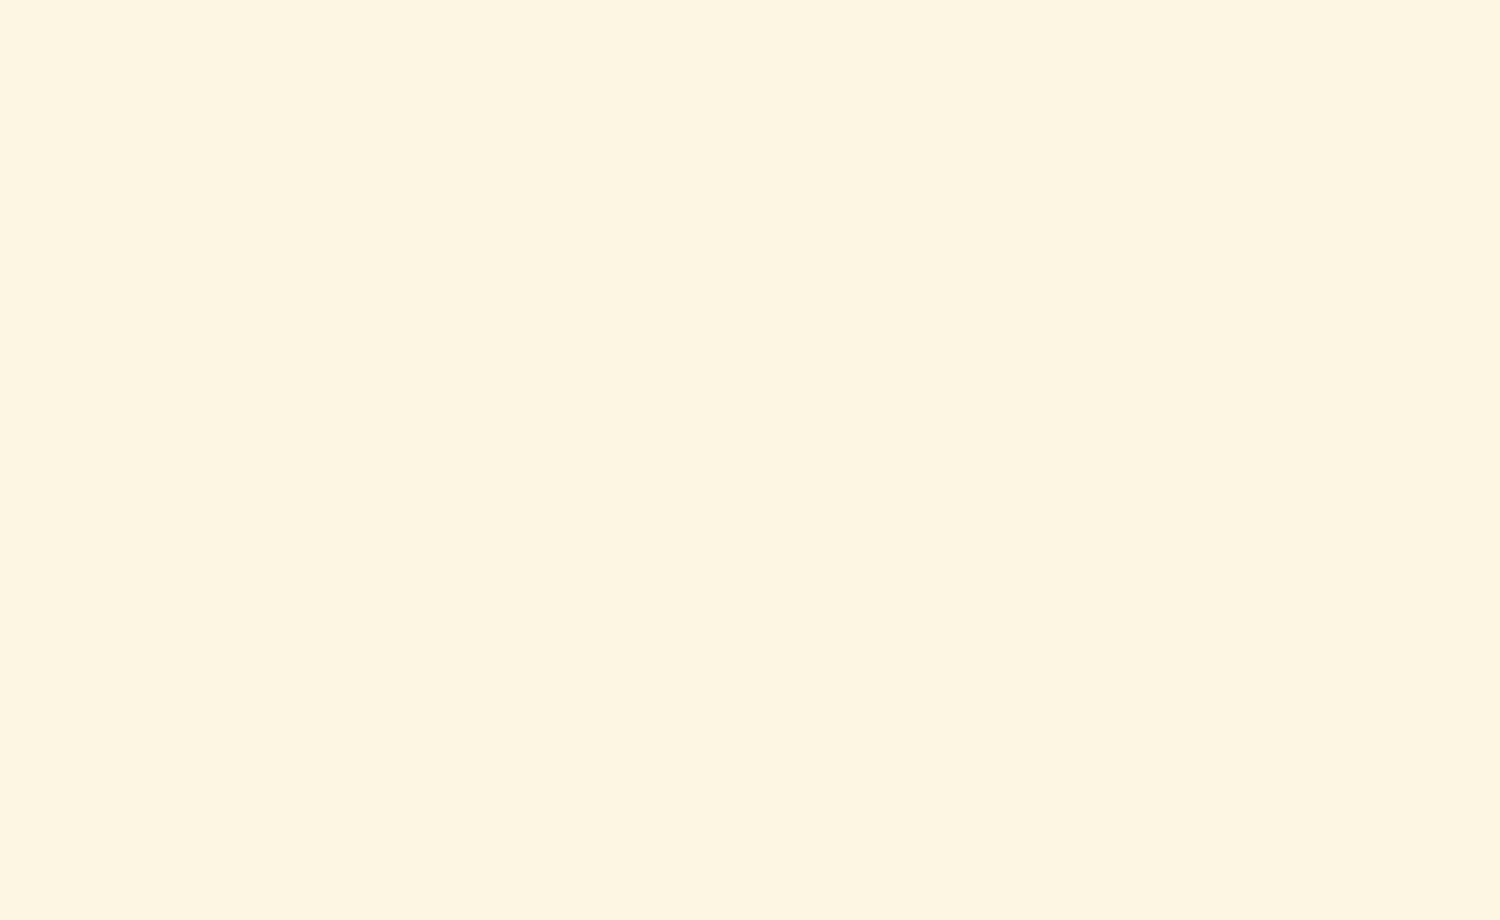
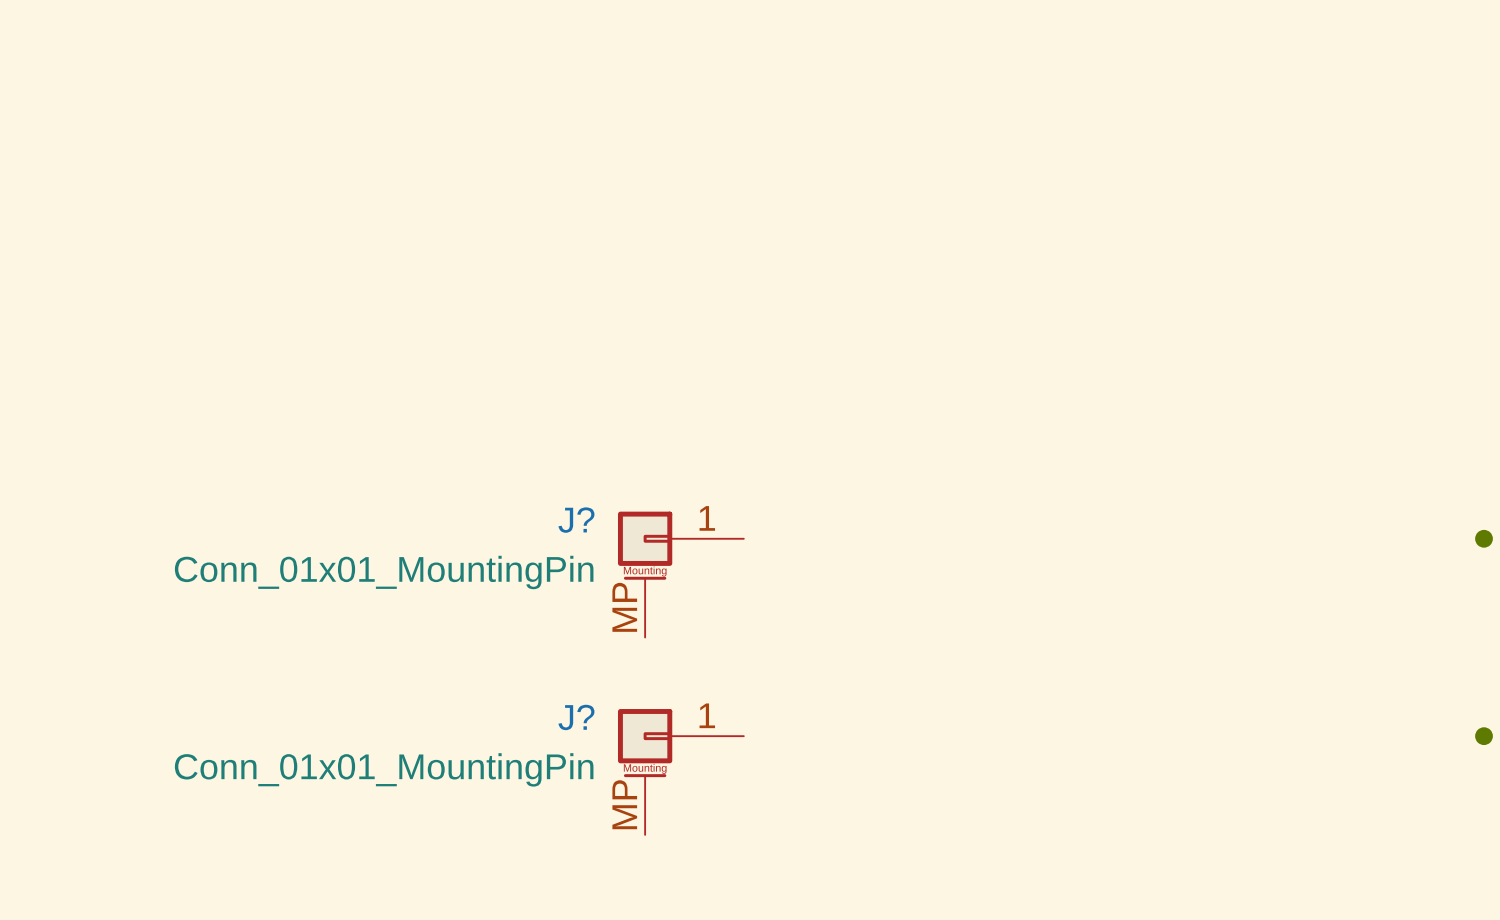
junction: none -> (1484, 538)
J?: none -> Conn_01x01_MountingPin (680, 574)
junction: none -> (1484, 736)
J?: none -> Conn_01x01_MountingPin (680, 771)

